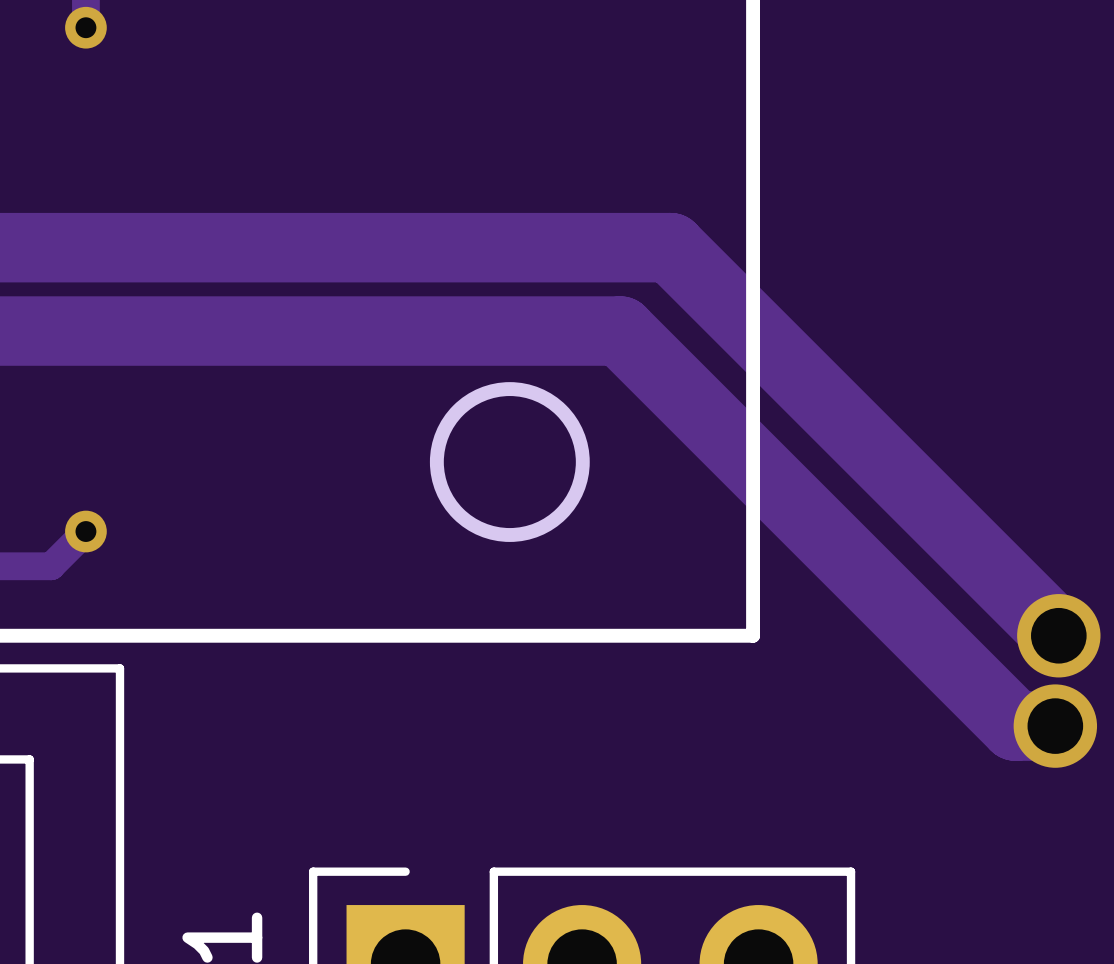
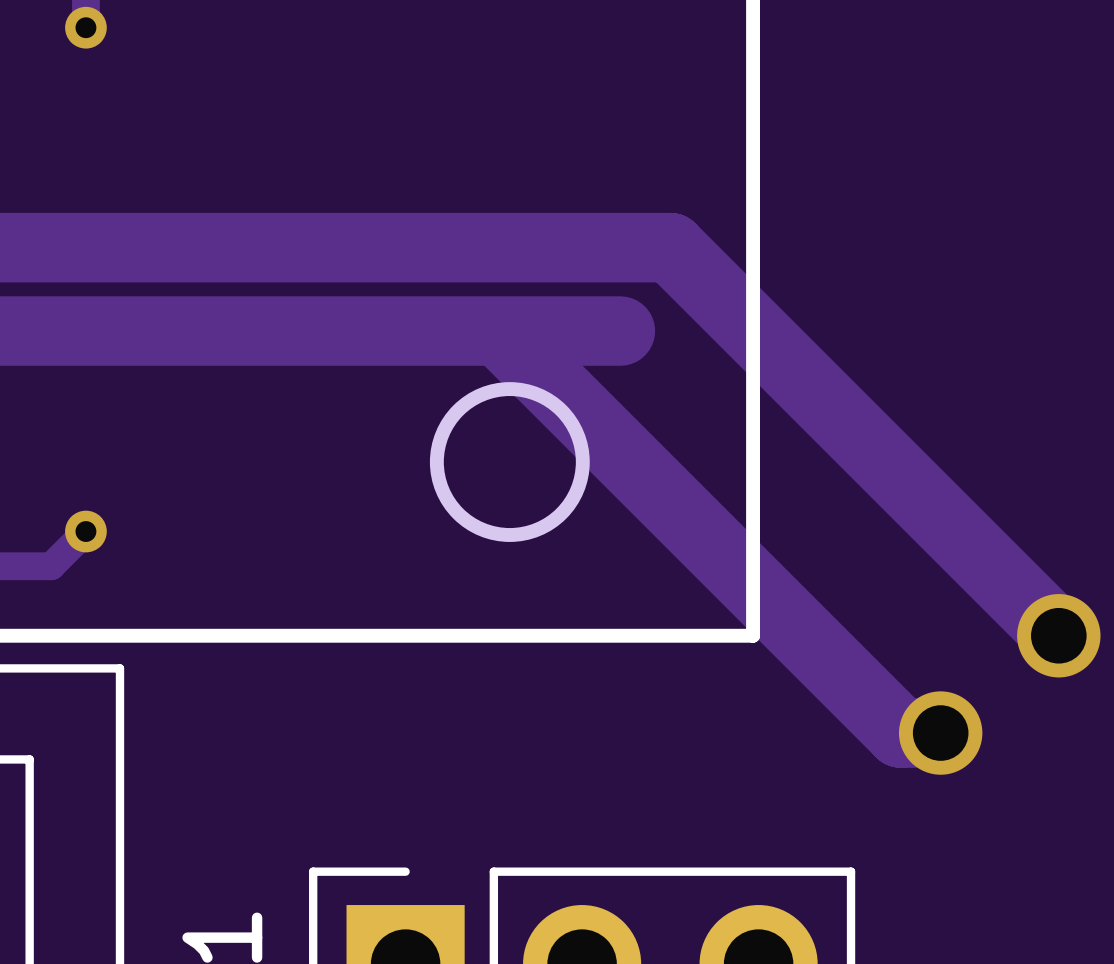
track: (620, 331) (1015, 726) (1058, 726) -> (505, 338) (900, 733) (944, 733)
via position: (1055, 726) -> (940, 733)

